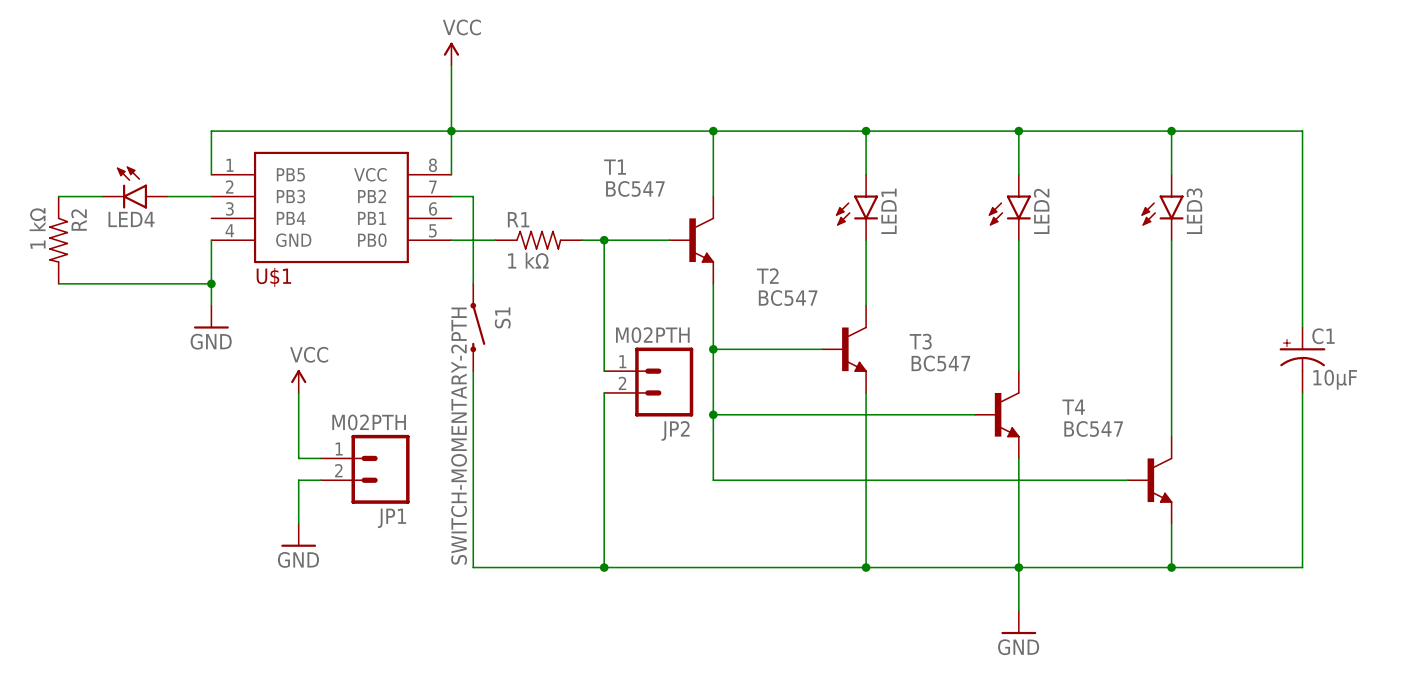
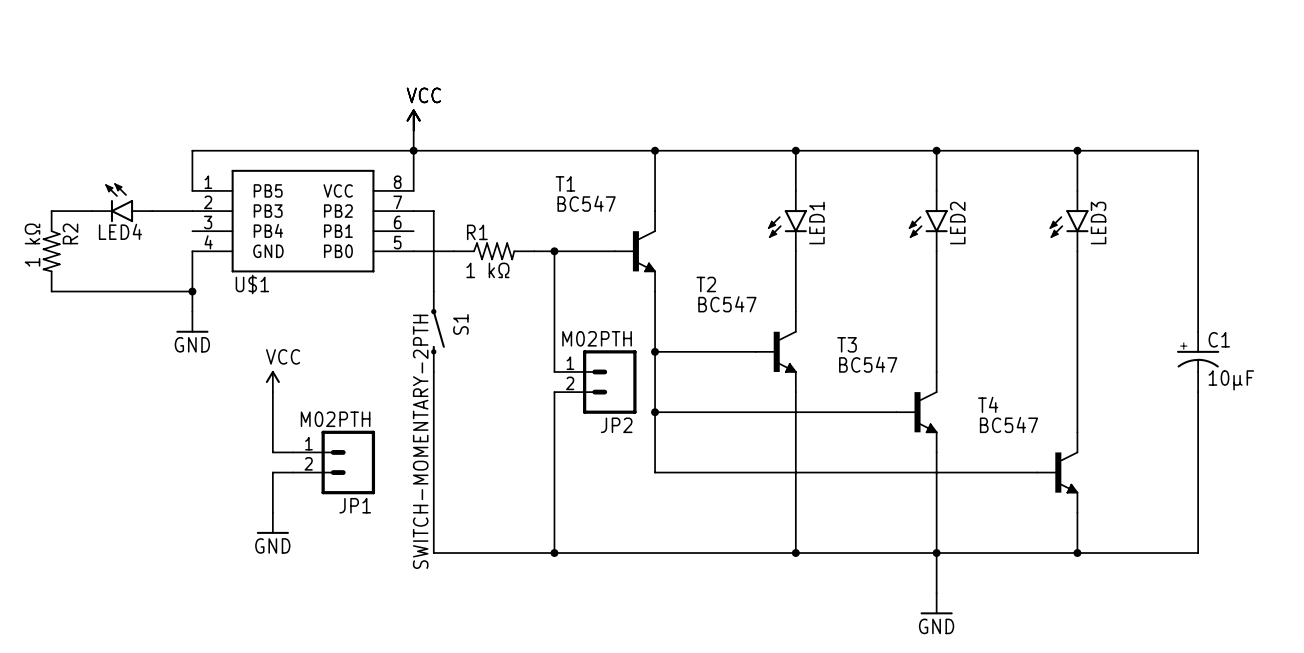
power symbol position: VCC (451, 54) -> VCC (413, 120)

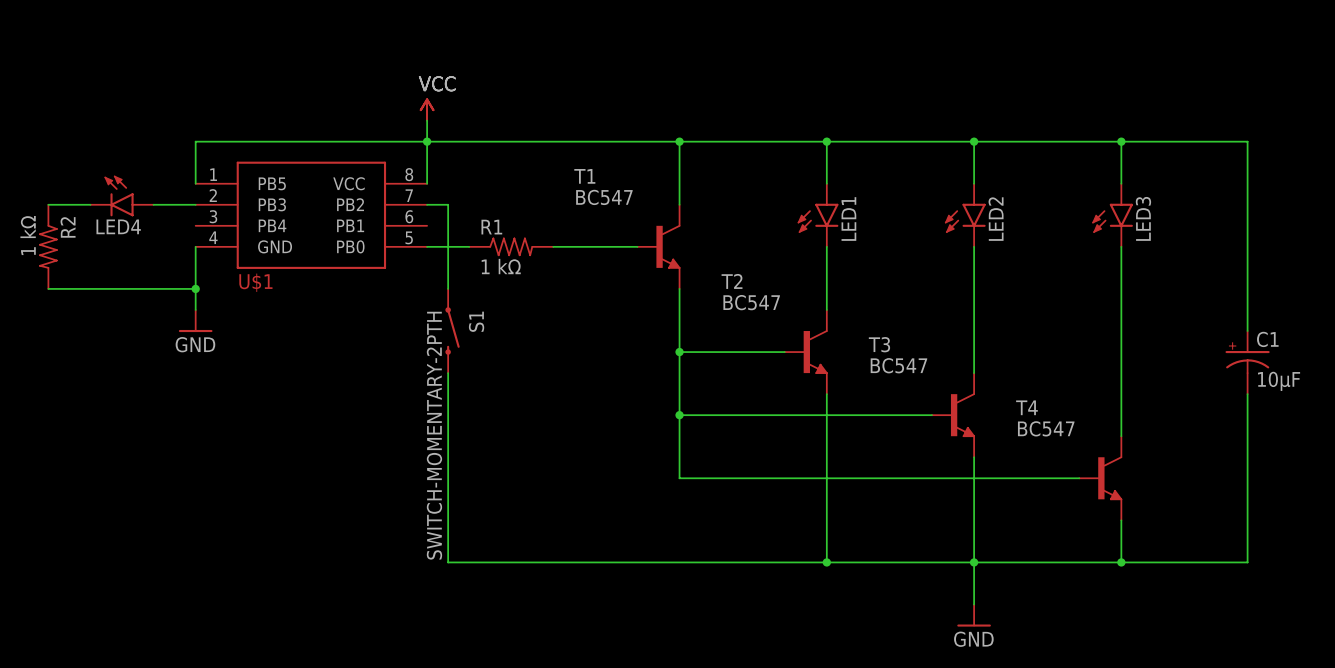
wire: (554, 251) (554, 371) -> none
junction: (554, 251) -> none
power symbol: VCC (272, 381) -> none
JP2: M02PTH (595, 382) -> none
wire: (272, 392) (272, 452) (292, 452) -> none
wire: (554, 392) (554, 553) -> none
JP1: M02PTH (334, 462) -> none
wire: (292, 472) (272, 472) (272, 512) -> none
power symbol: GND (272, 523) -> none
junction: (554, 553) -> none

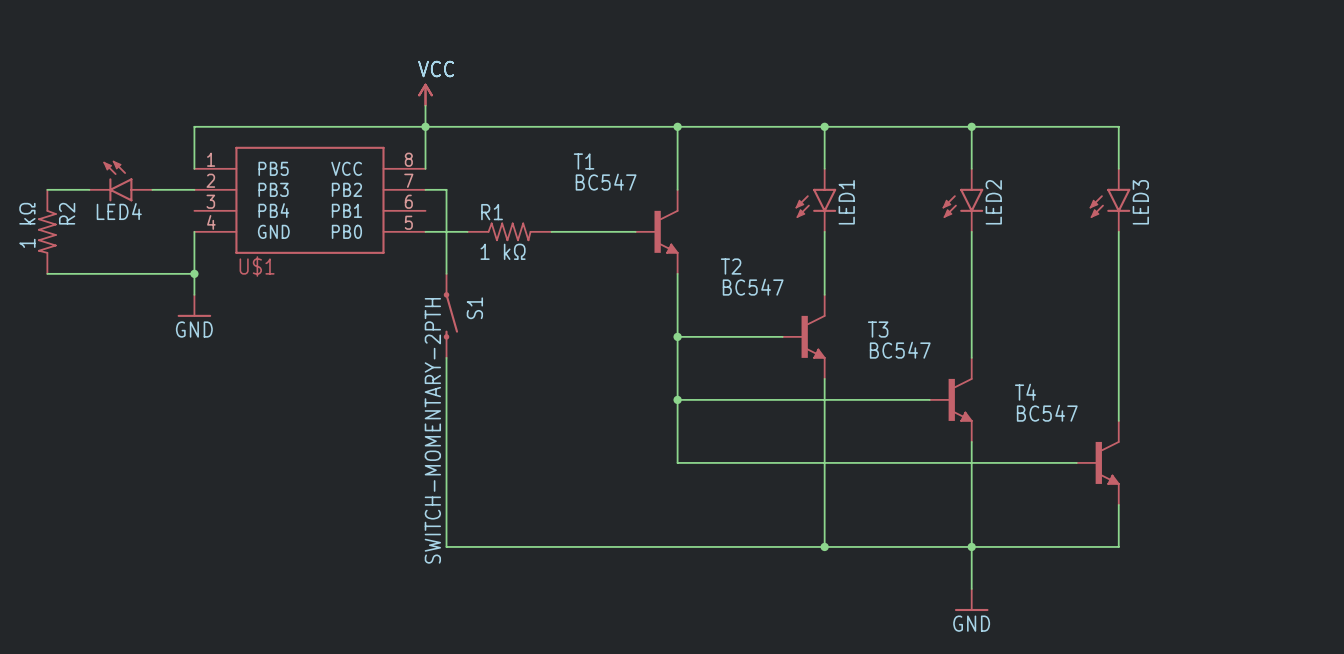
wire: (1121, 141) (1247, 141) (1247, 331) -> none
junction: (1121, 141) -> none
C1: 10µF (1247, 362) -> none
wire: (1247, 394) (1247, 562) (1121, 562) -> none
junction: (1121, 562) -> none

